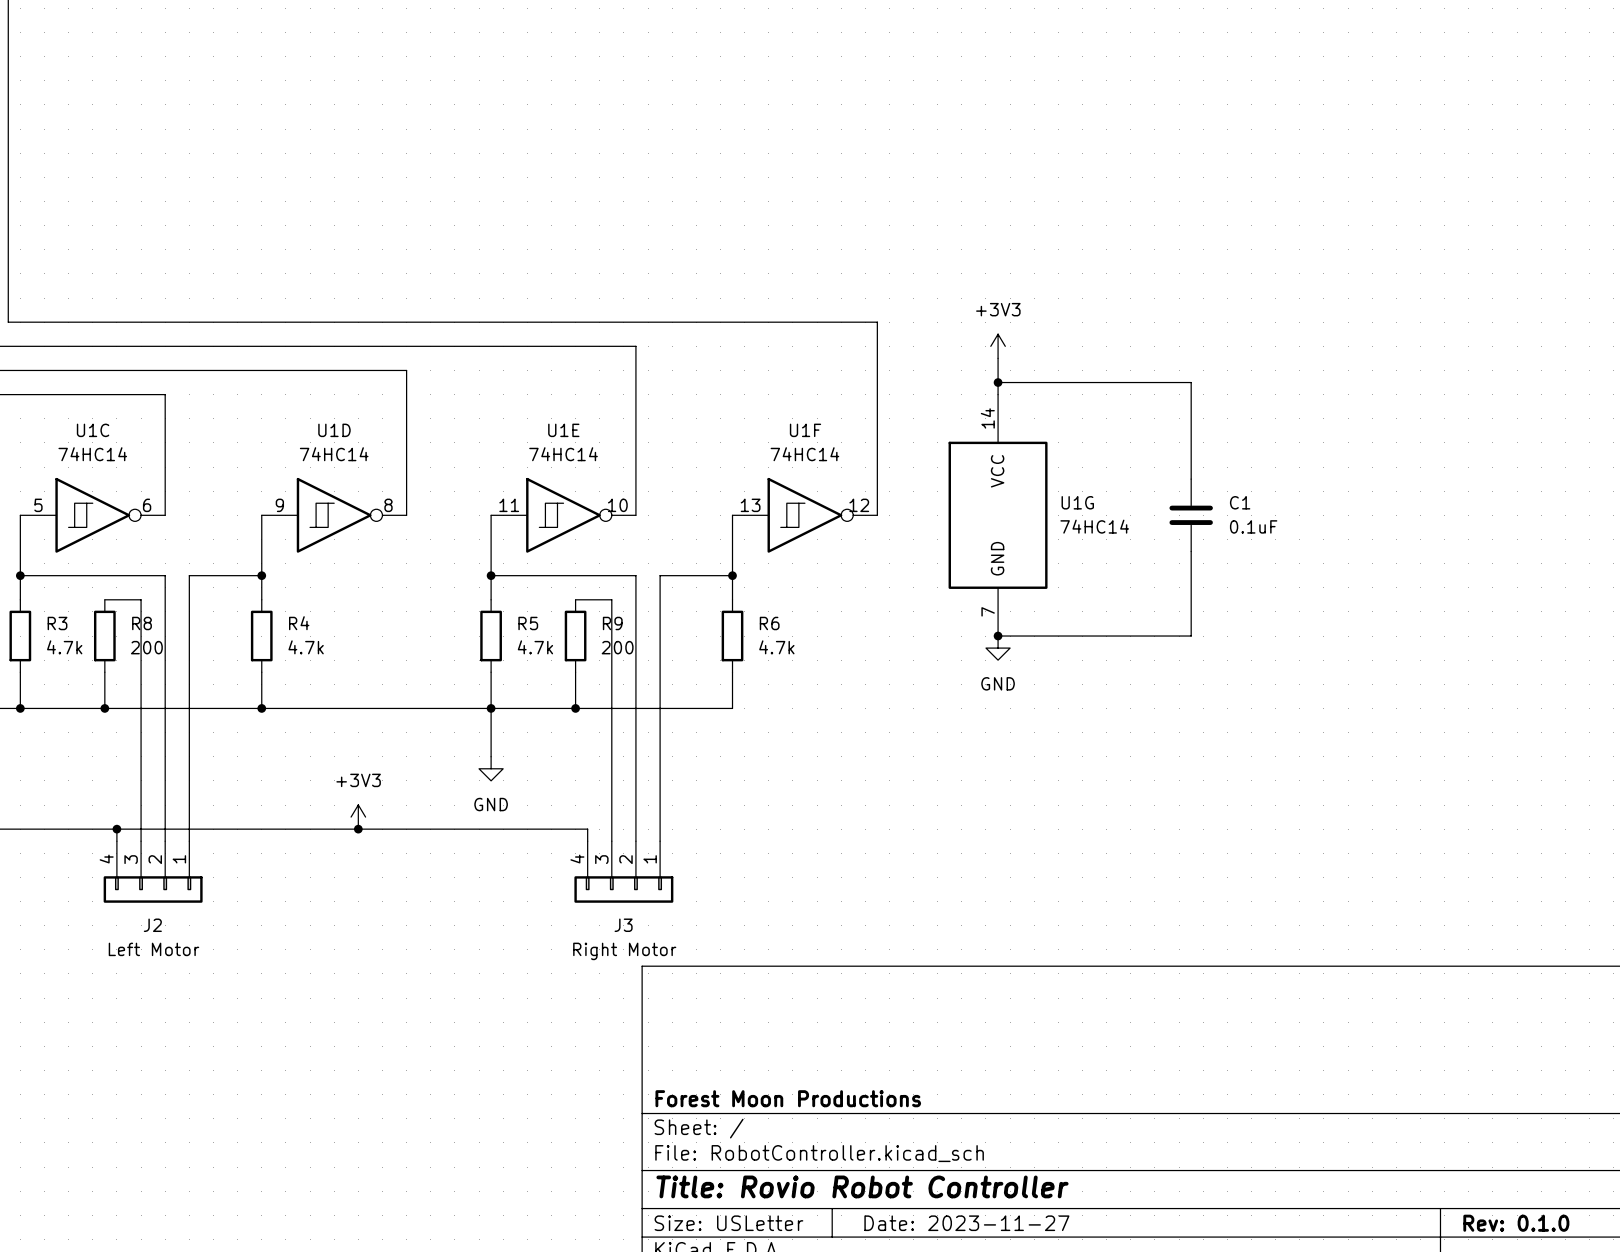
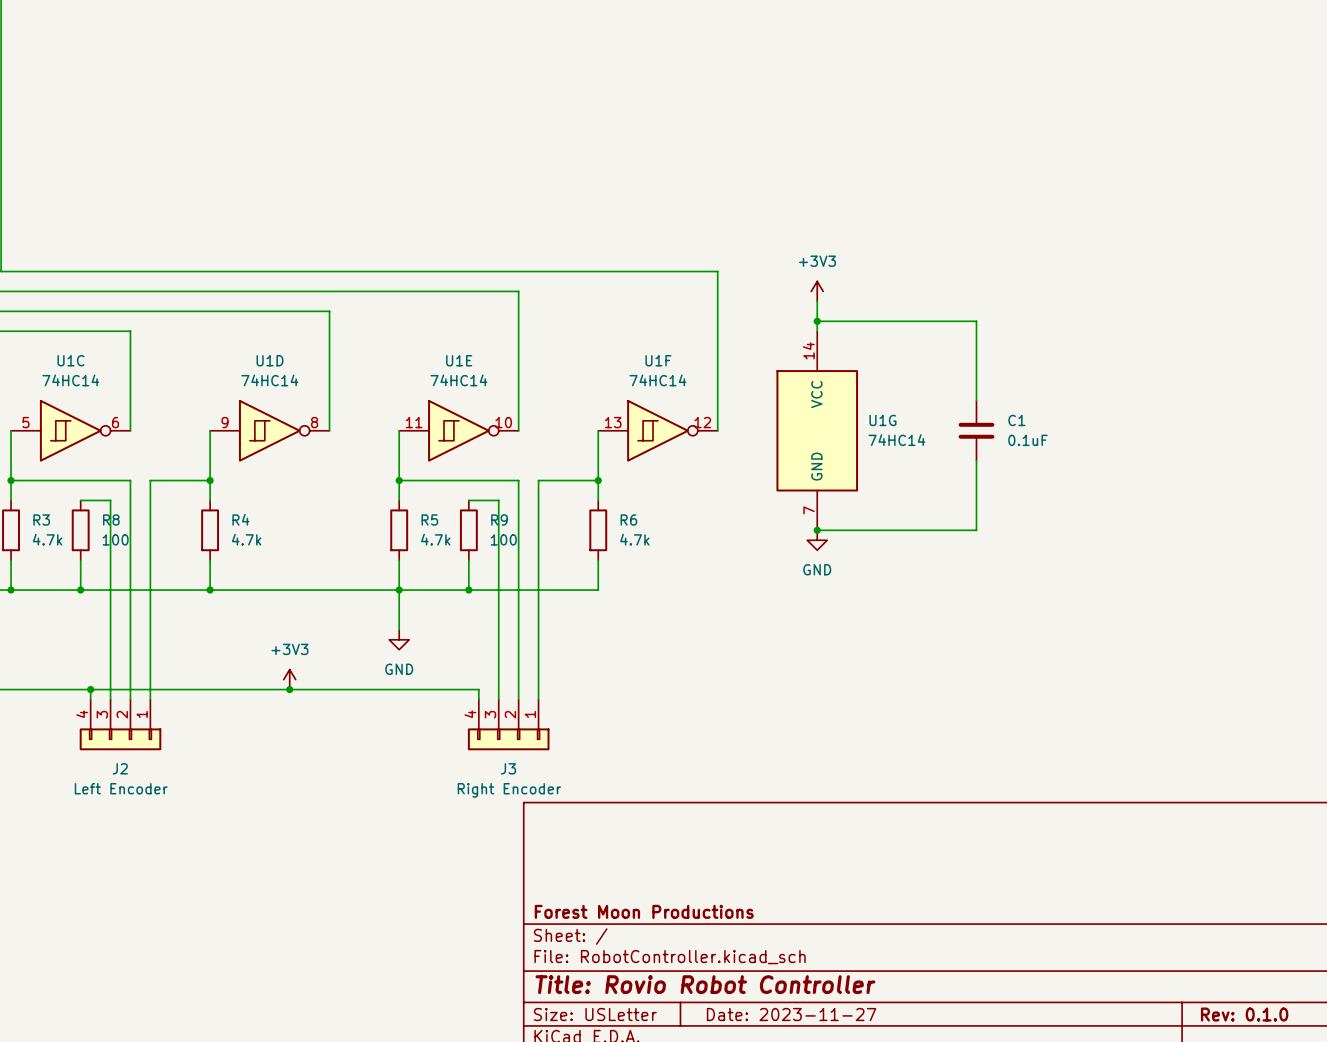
R8 value: 200 (146, 647) -> 100 (115, 539)
R9 value: 200 (617, 647) -> 100 (503, 539)
J2 value: Left Motor (153, 949) -> Left Encoder (121, 788)
J3 value: Right Motor (624, 951) -> Right Encoder (509, 790)

